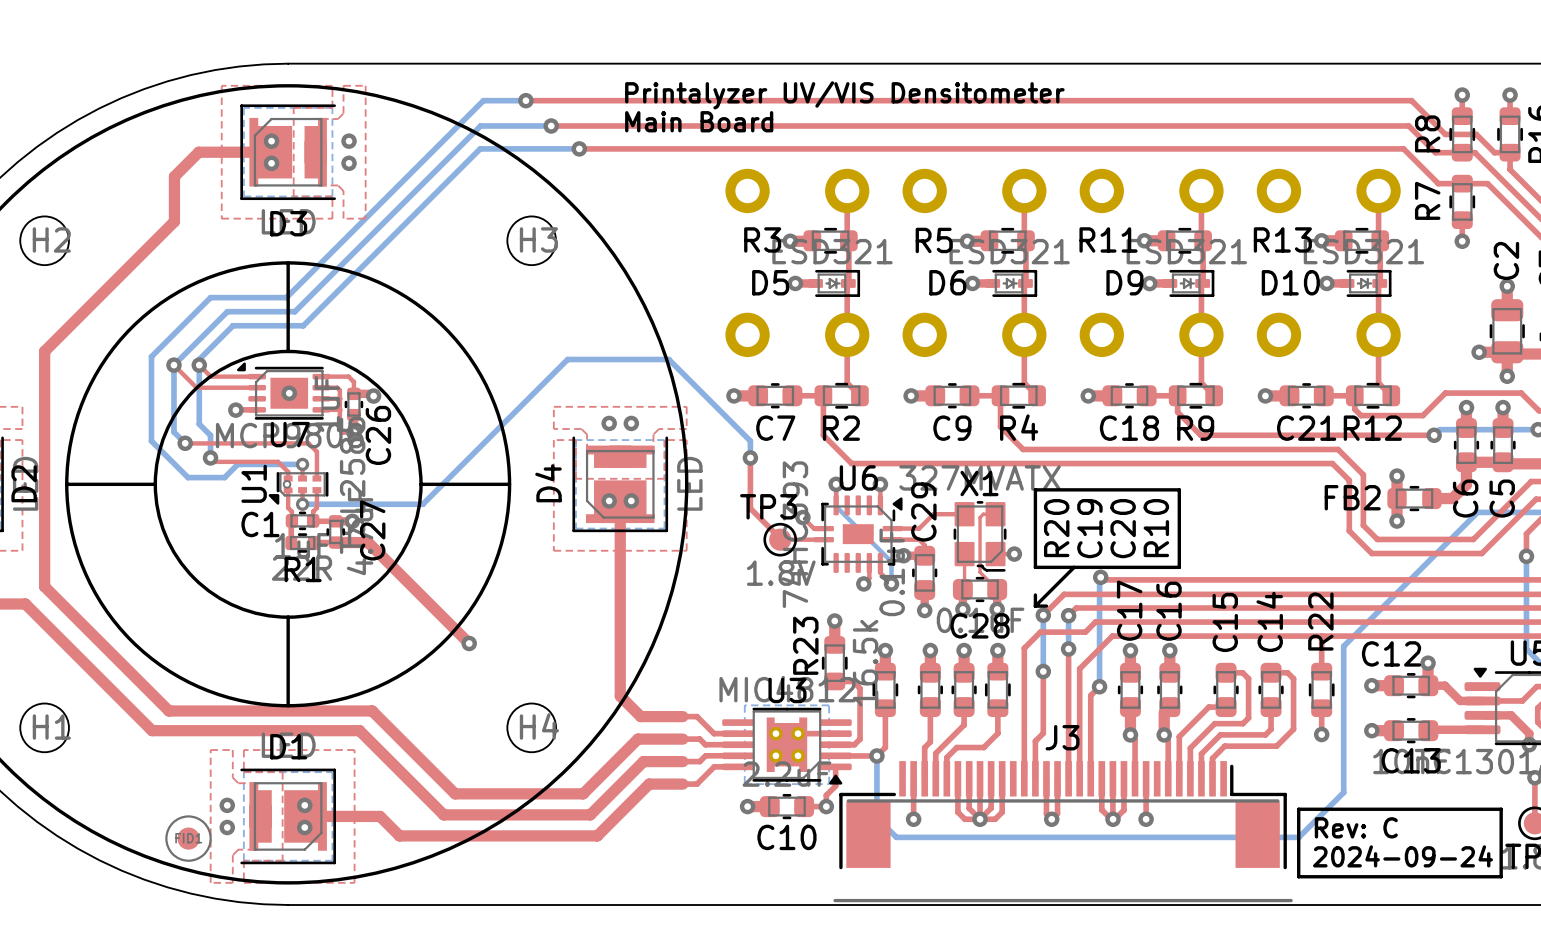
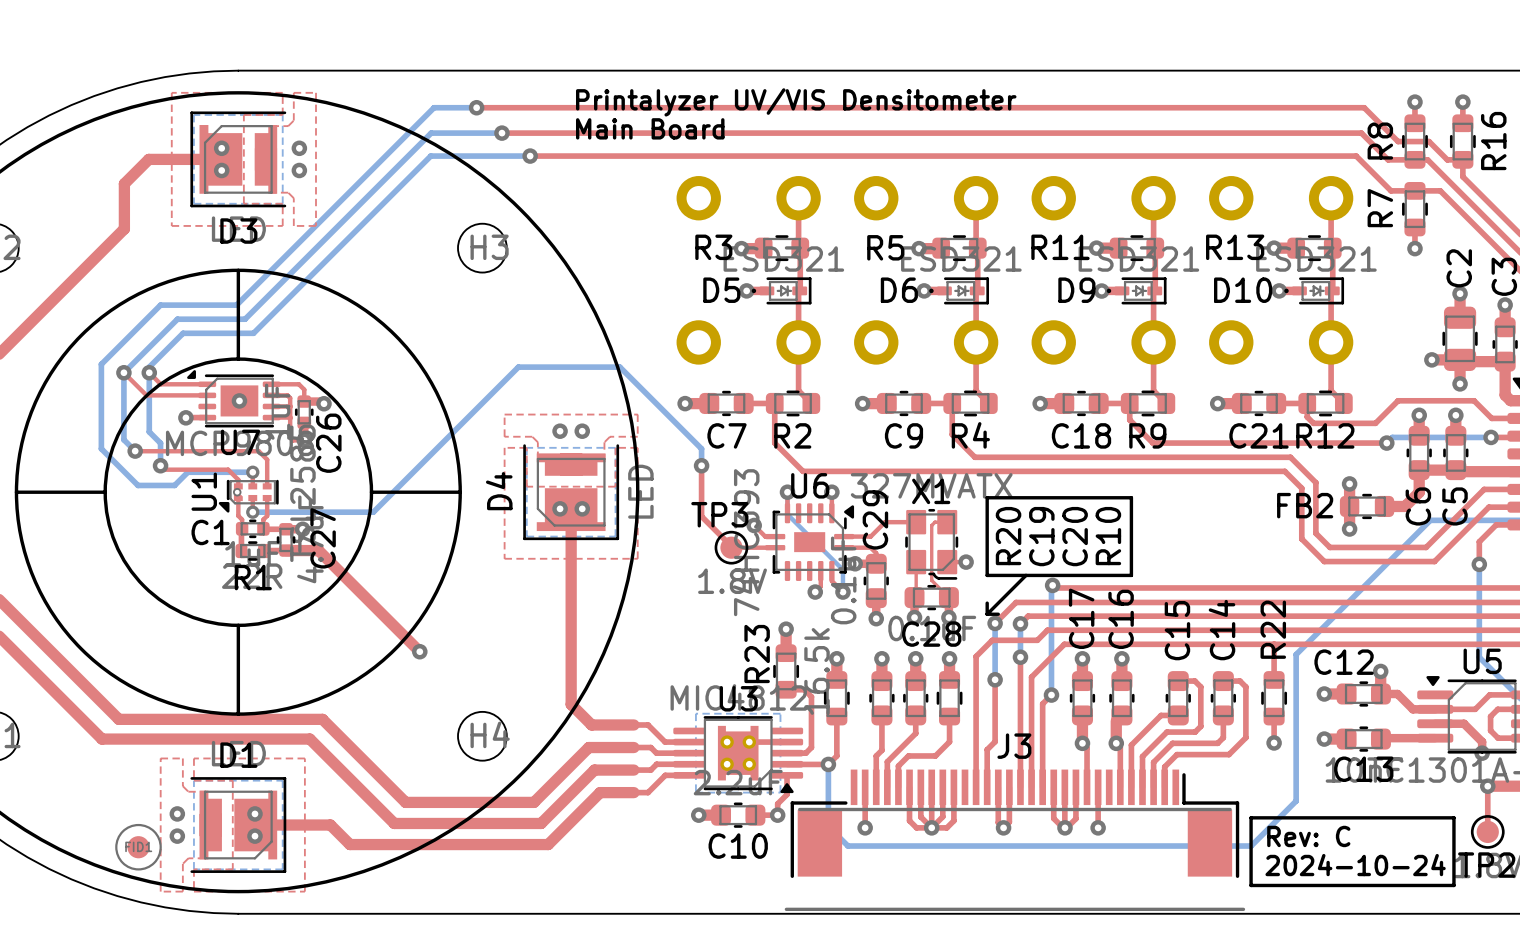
D5 footprint: [808, 269, 861, 297] -> [751, 277, 812, 305]
D6 footprint: [985, 269, 1038, 297] -> [929, 277, 990, 305]
D9 footprint: [1162, 269, 1215, 297] -> [1106, 277, 1167, 305]
D10 footprint: [1339, 269, 1392, 297] -> [1284, 277, 1345, 305]
text: 2024-09-24 (1403, 856) -> 2024-10-24 (1355, 865)

